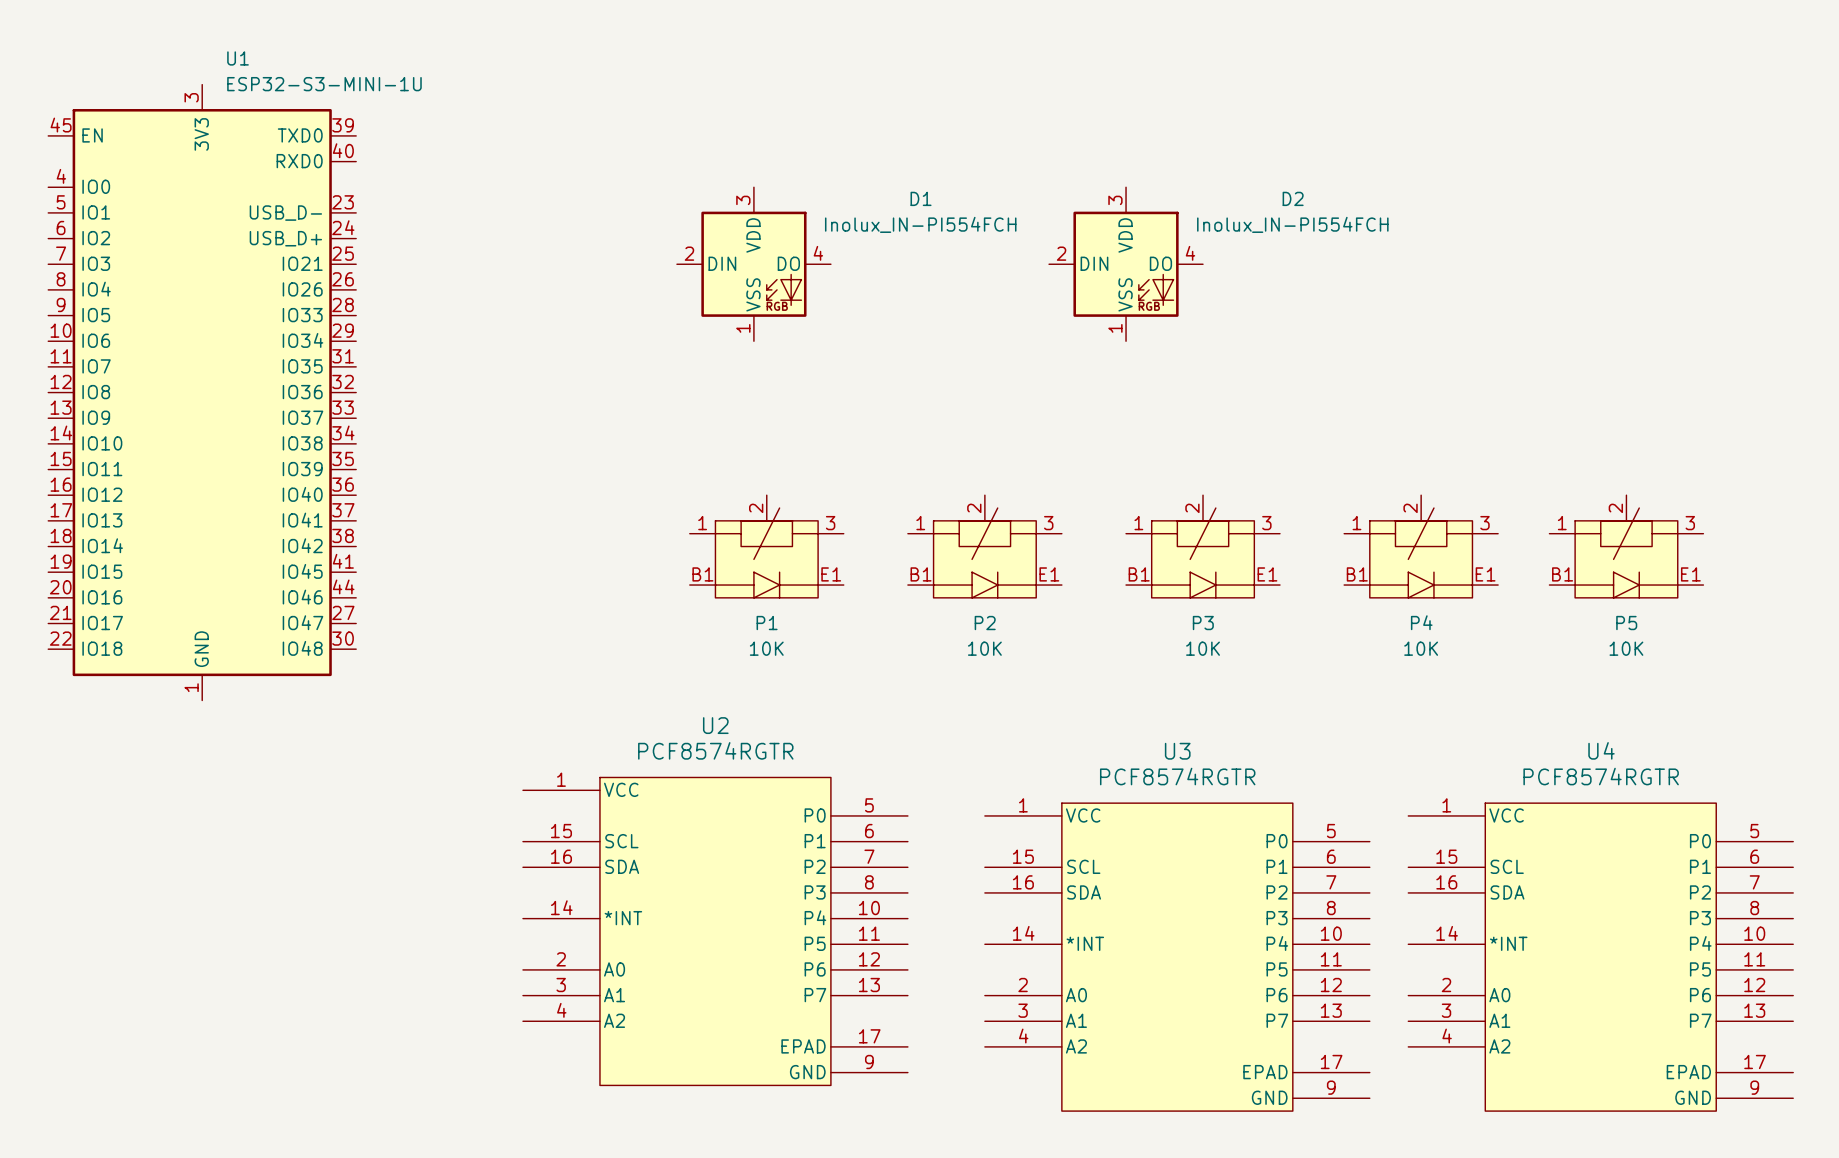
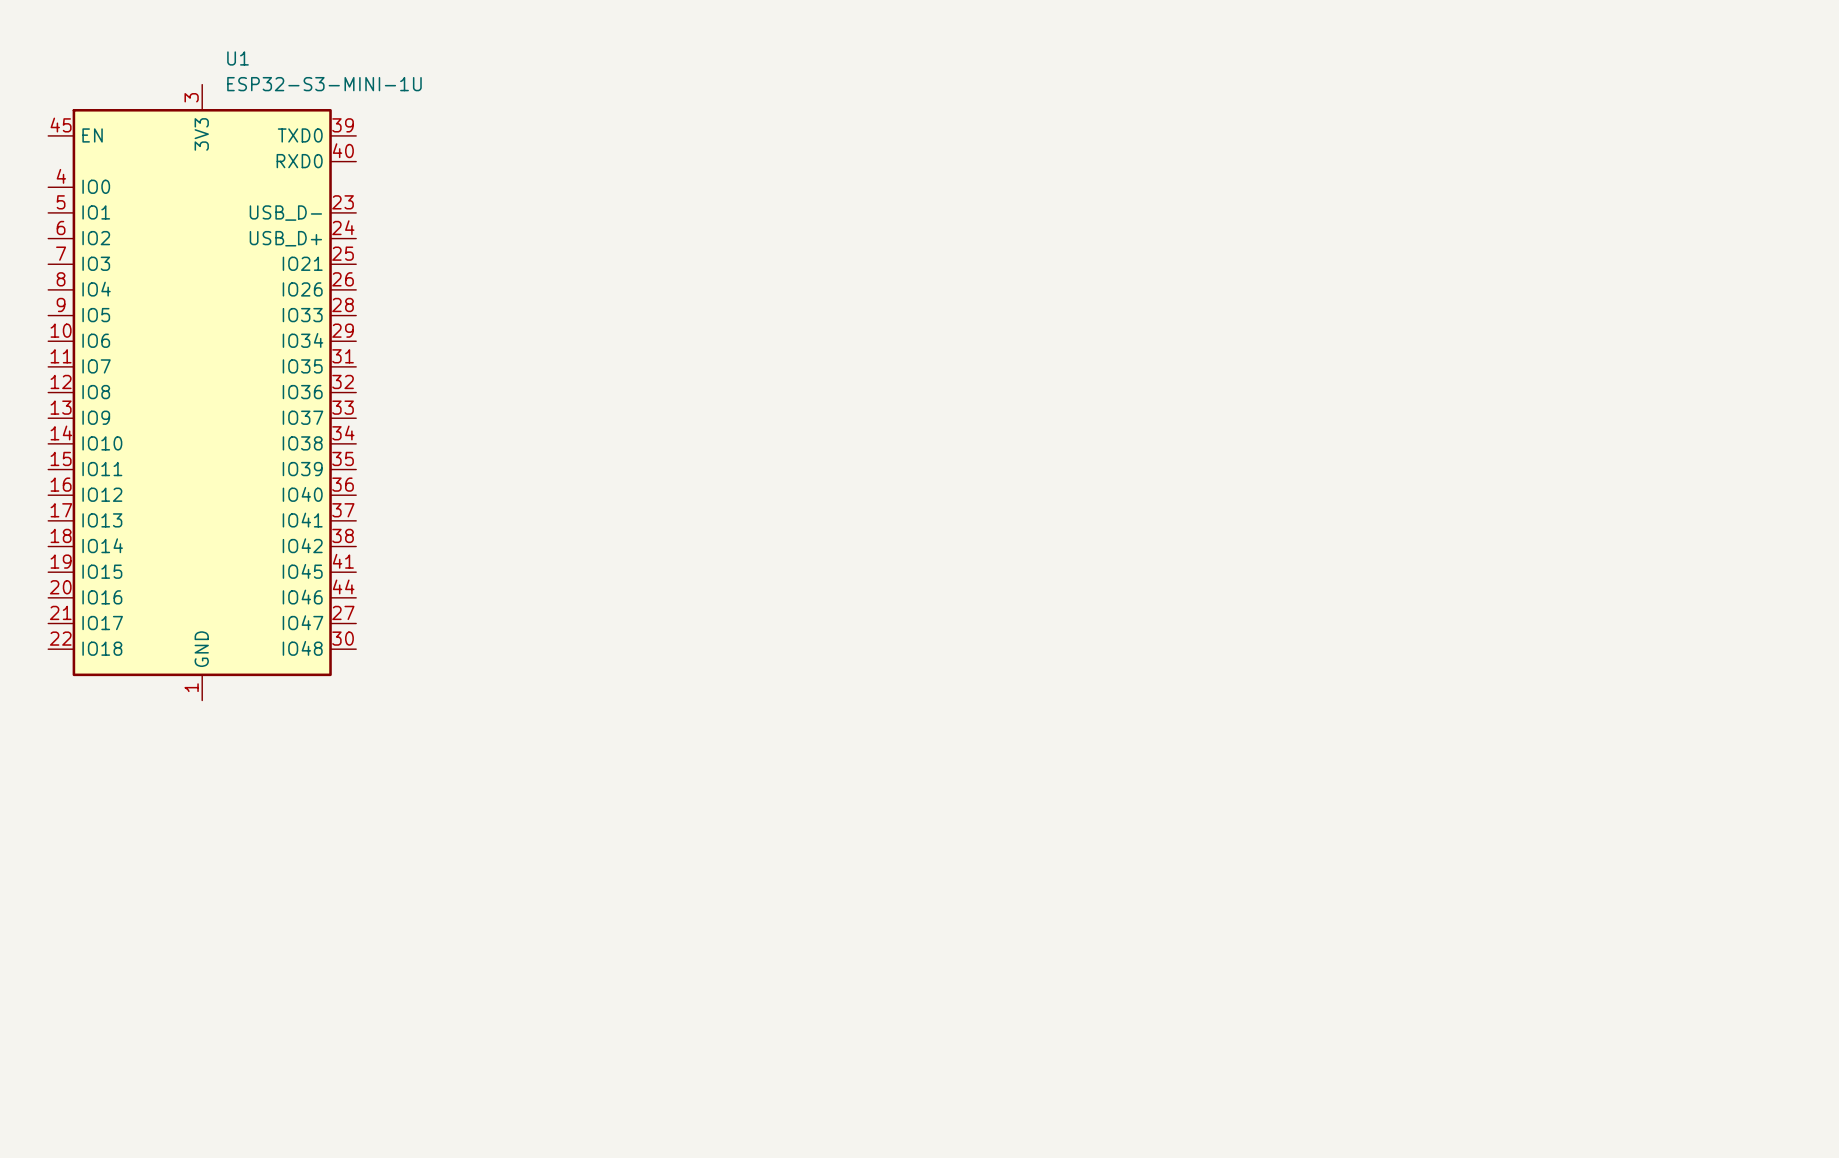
D1: Inolux_IN-PI554FCH (753, 264) -> none
D2: Inolux_IN-PI554FCH (1126, 264) -> none
P1: 10K (766, 546) -> none
P2: 10K (984, 546) -> none
P3: 10K (1203, 546) -> none
P4: 10K (1421, 546) -> none
P5: 10K (1626, 546) -> none
U2: PCF8574RGTR (715, 931) -> none
U3: PCF8574RGTR (1177, 957) -> none
U4: PCF8574RGTR (1600, 957) -> none

